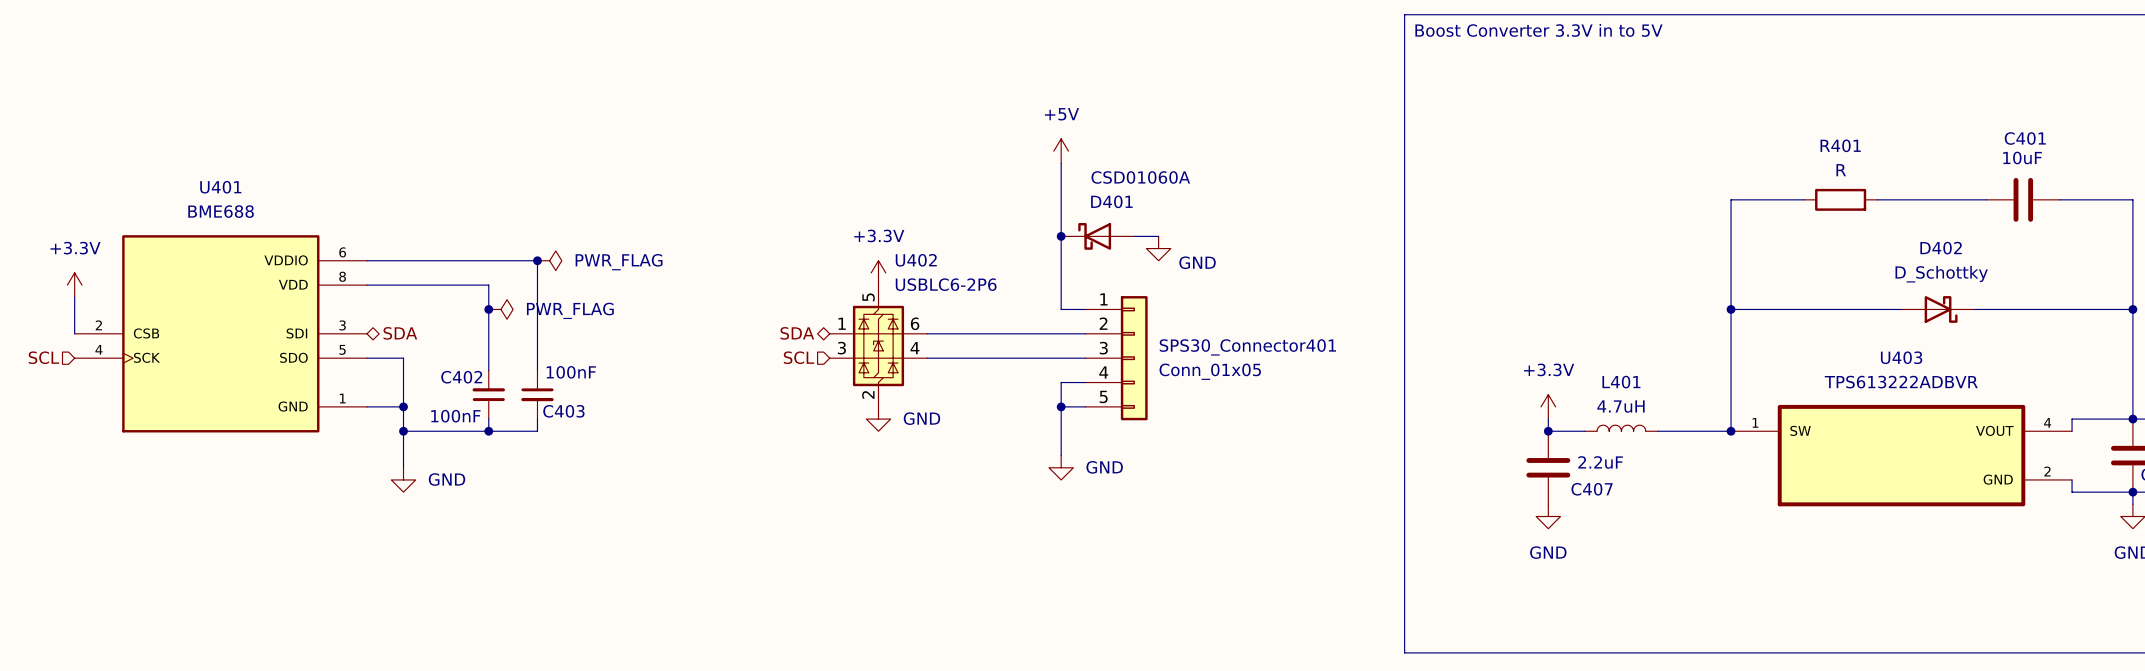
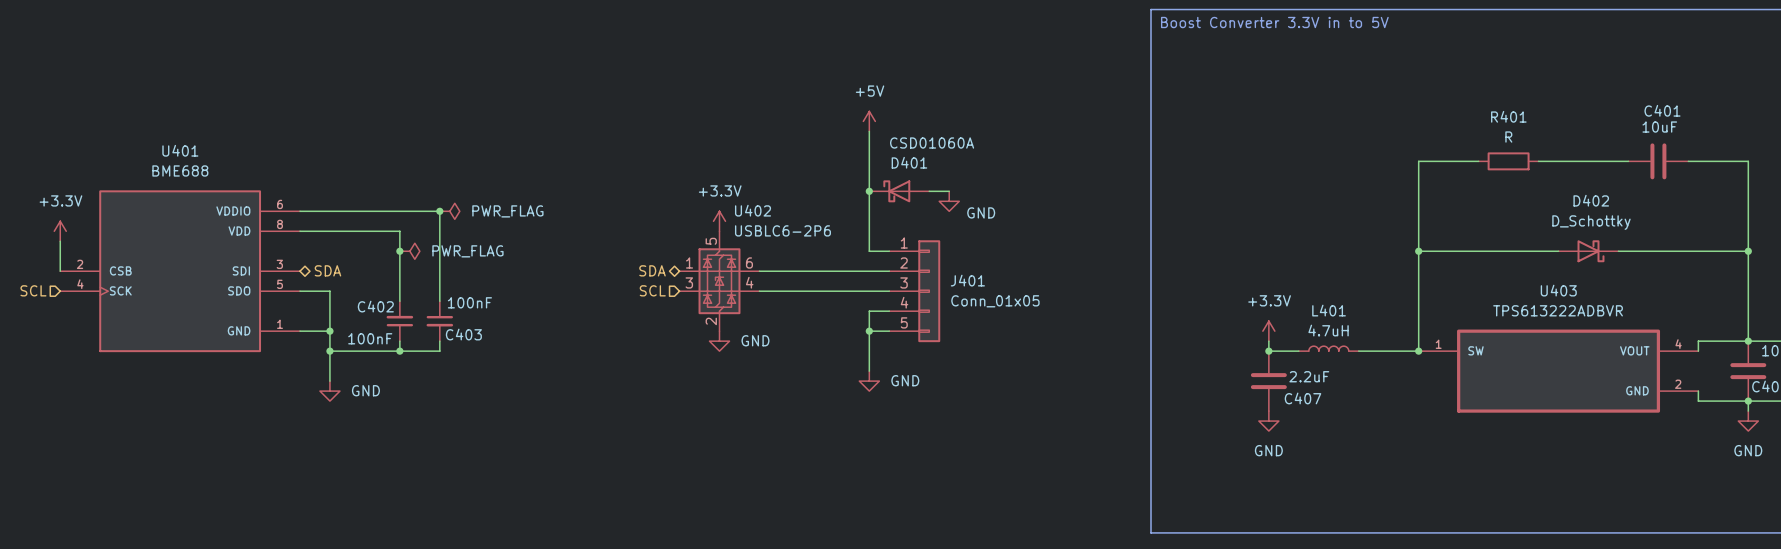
SPS30_Connector401 name: SPS30_Connector401 (1247, 347) -> J401 (967, 280)

